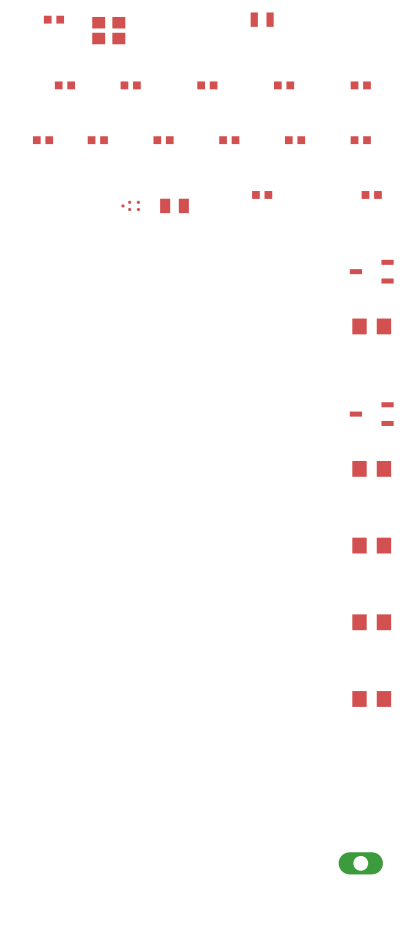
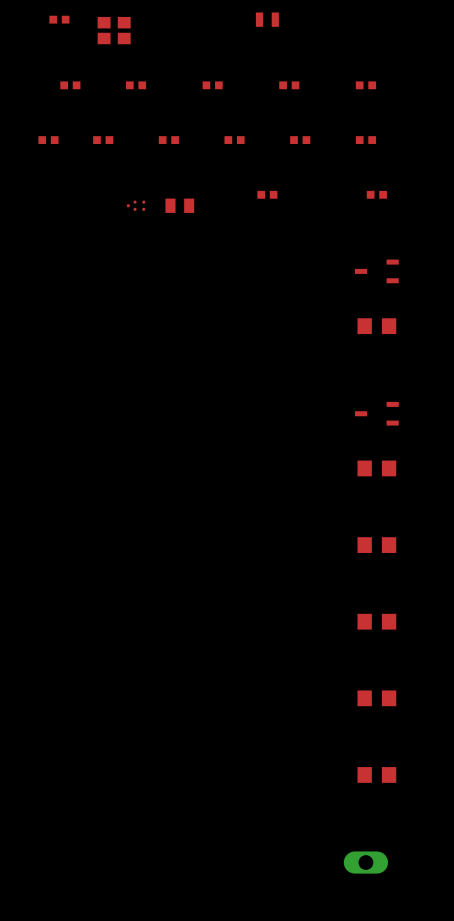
part: none -> (376, 774)

